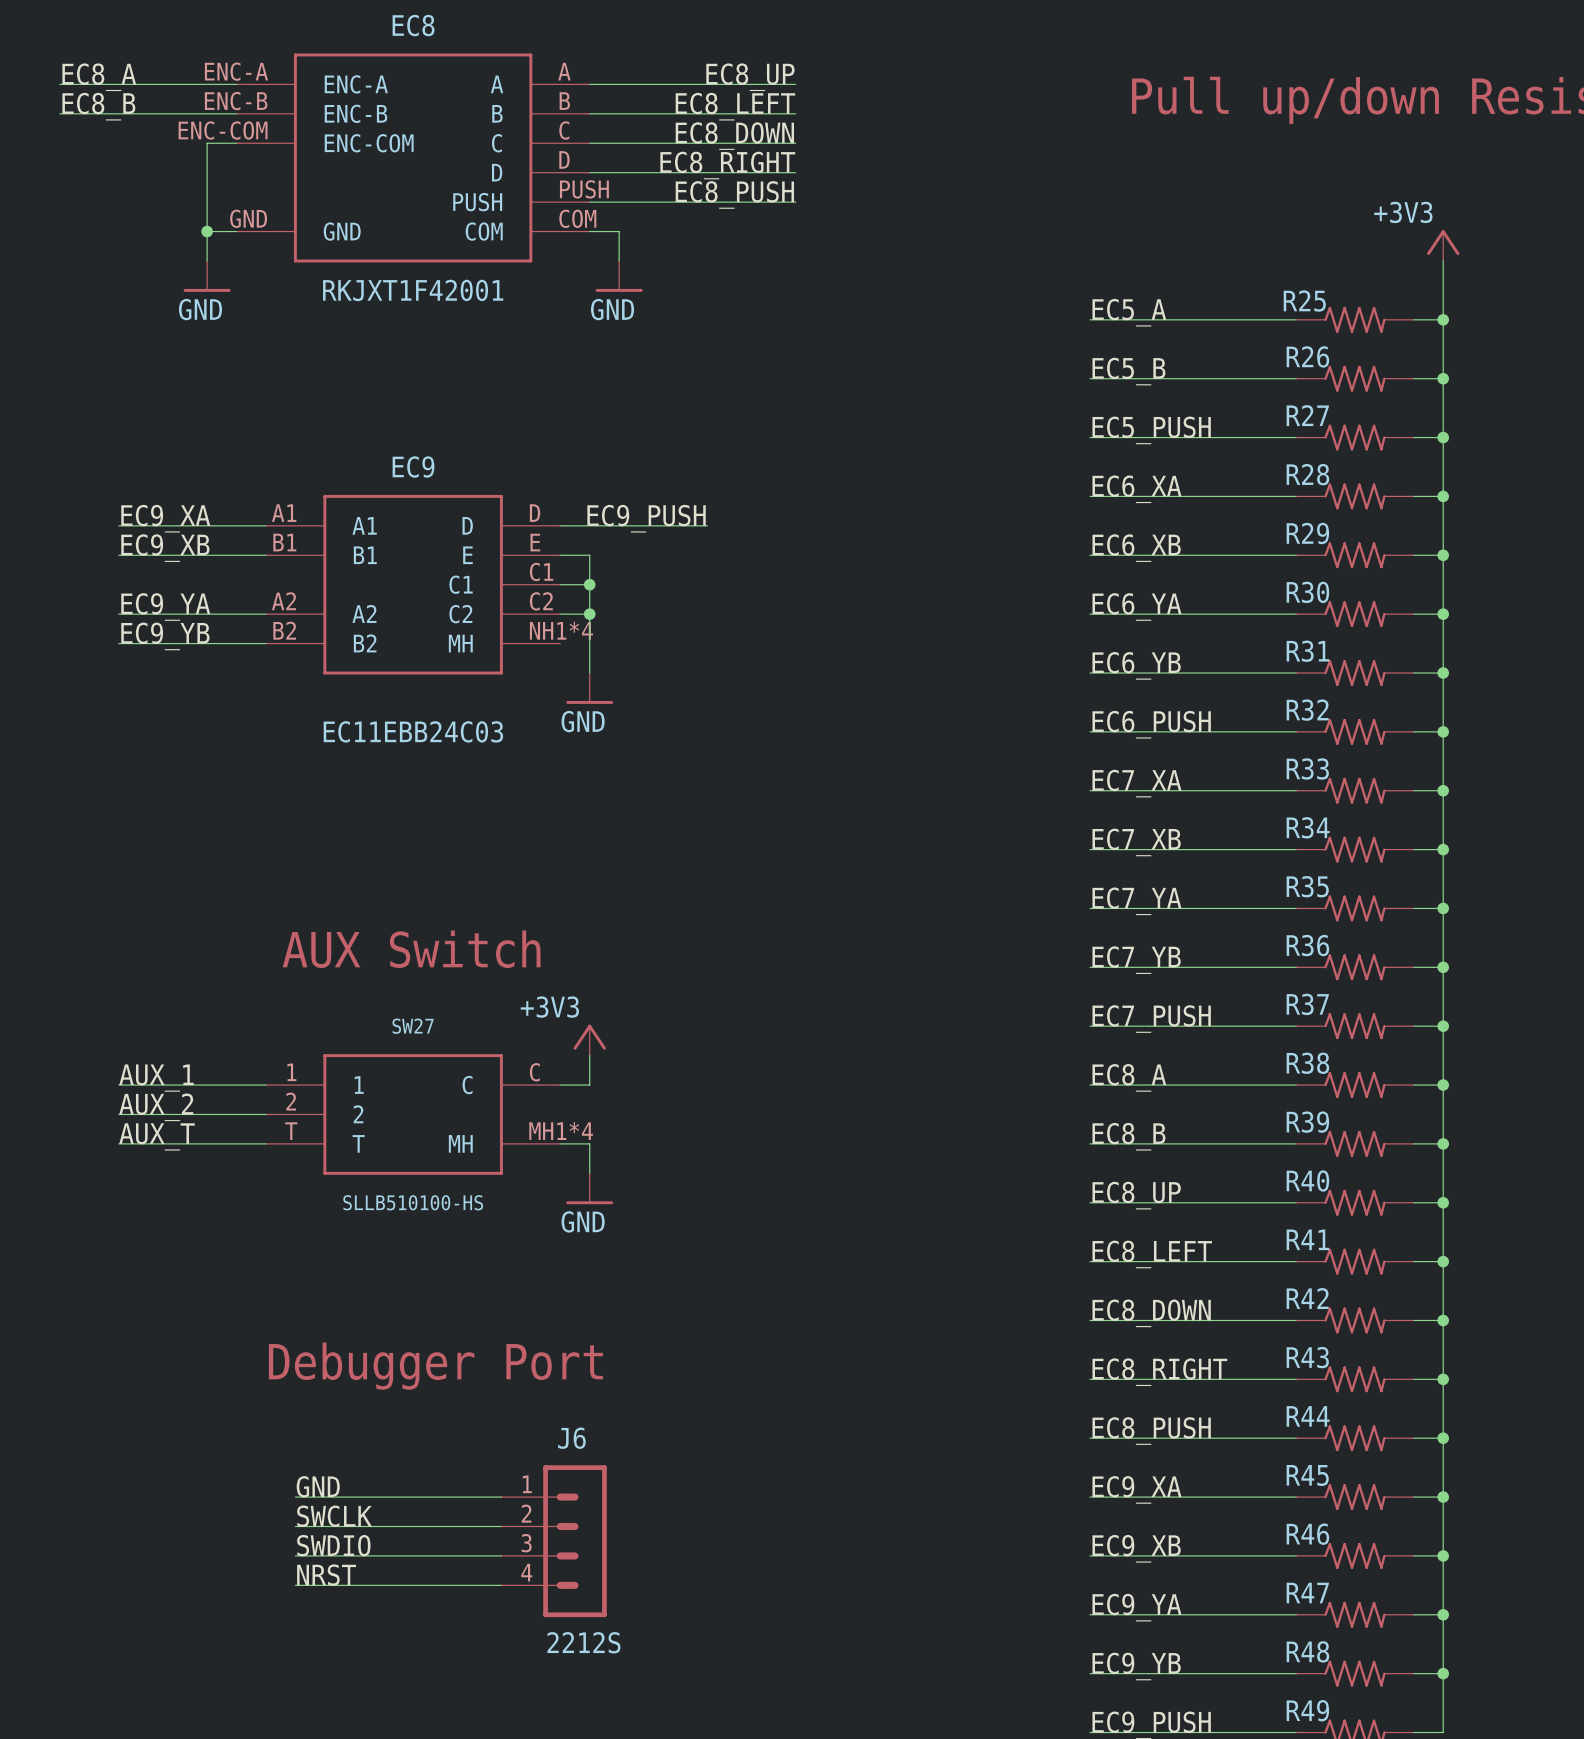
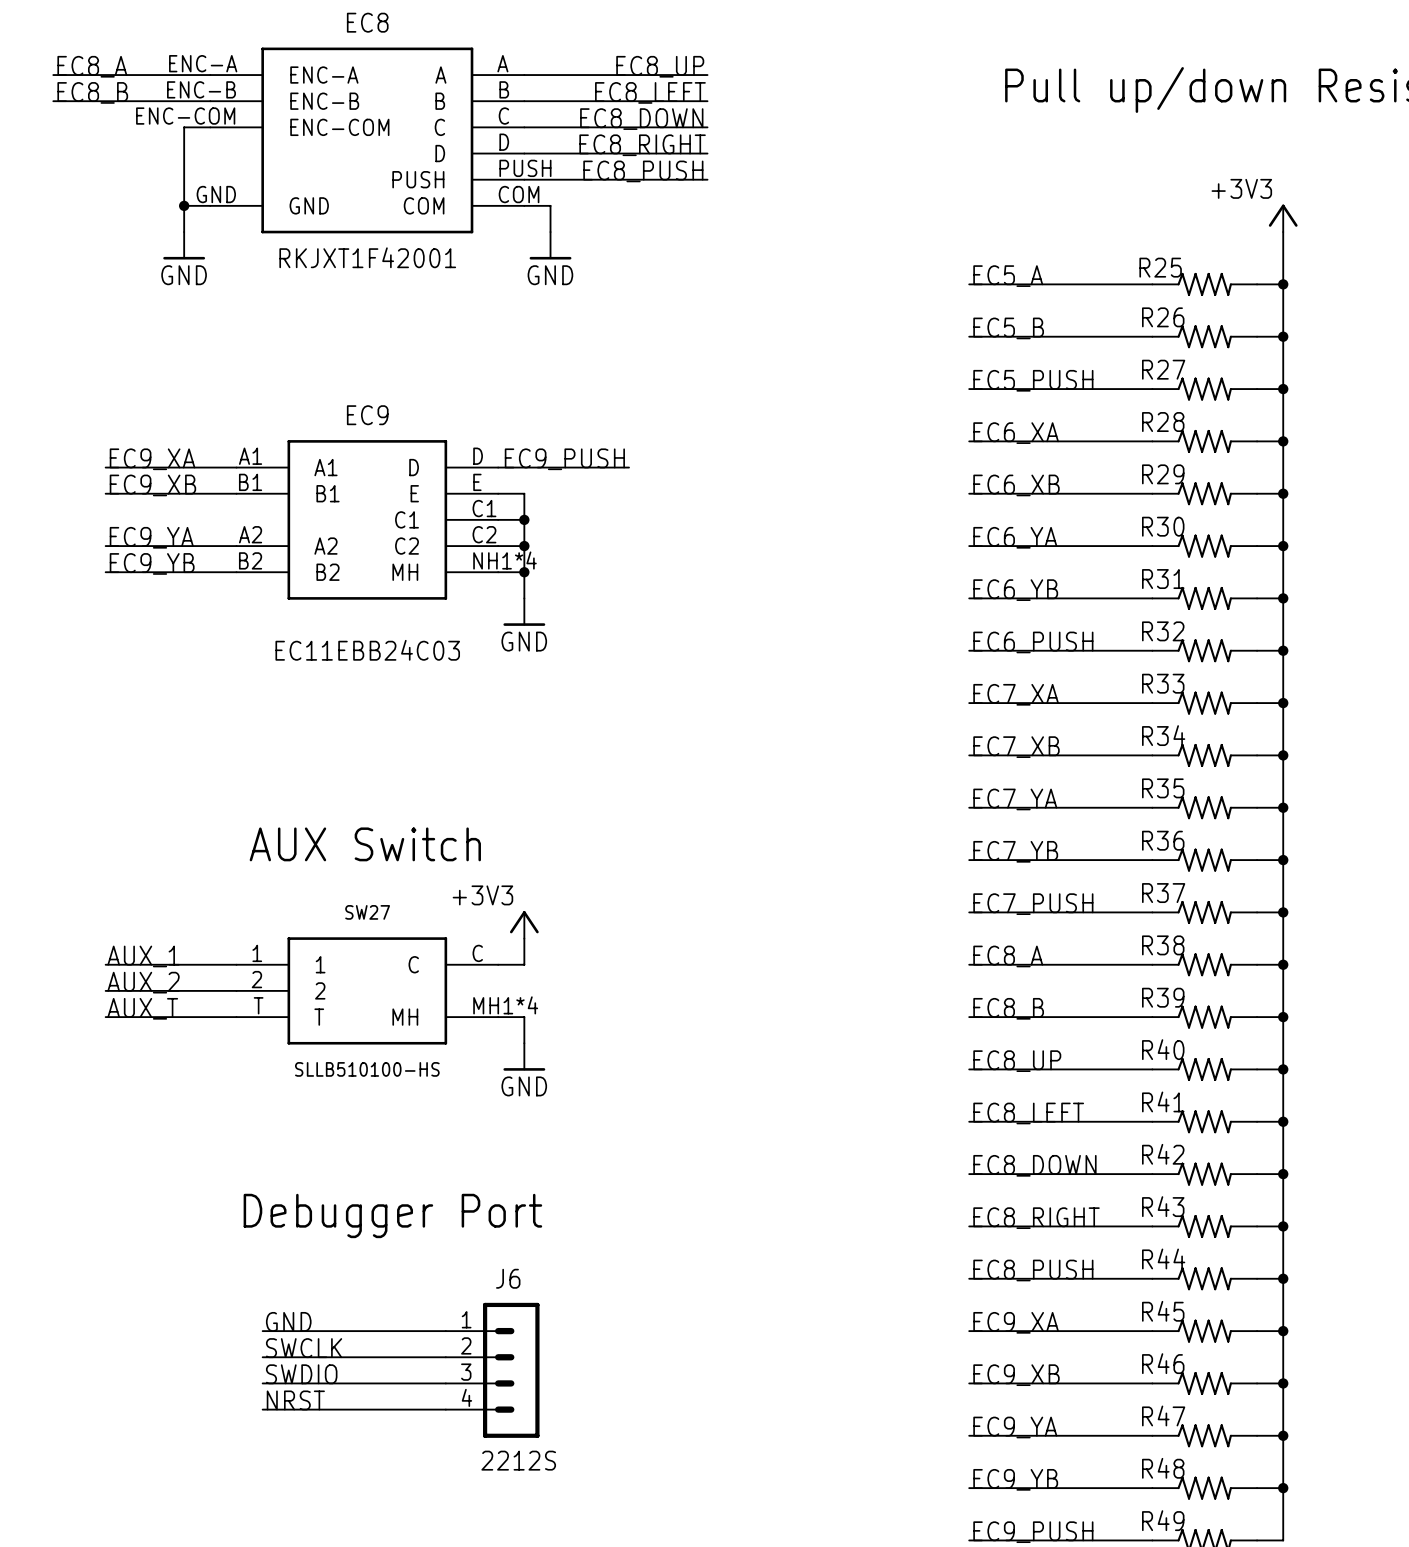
wire: none -> (498, 572) (524, 572)
junction: none -> (524, 572)

